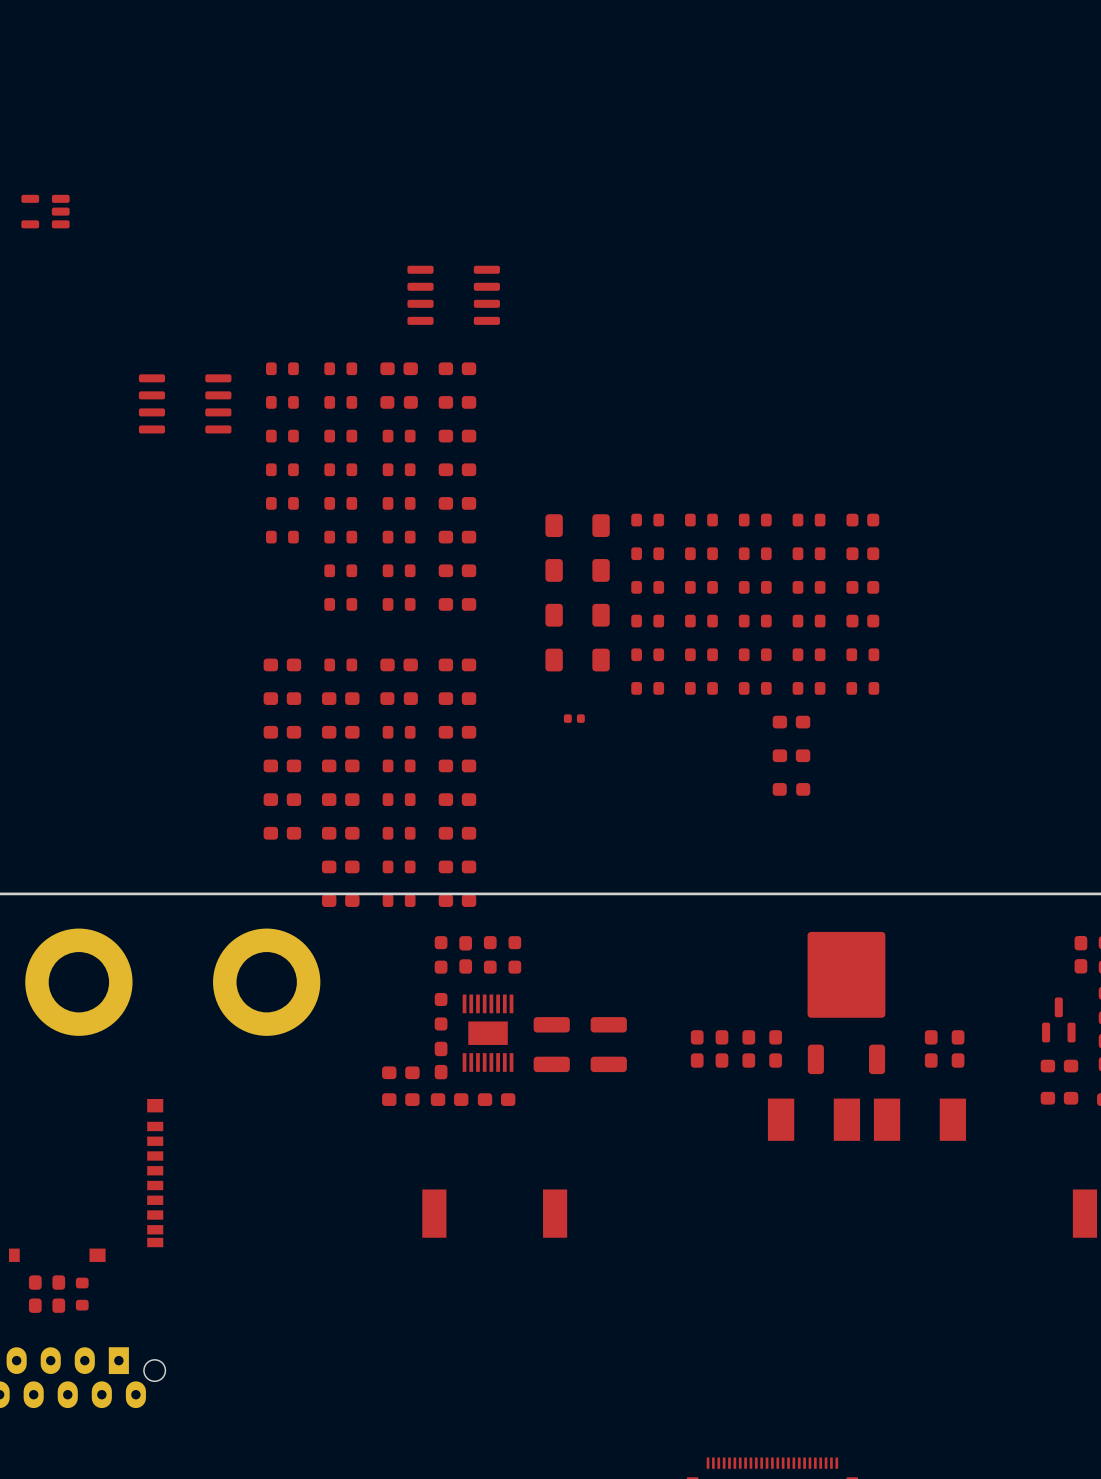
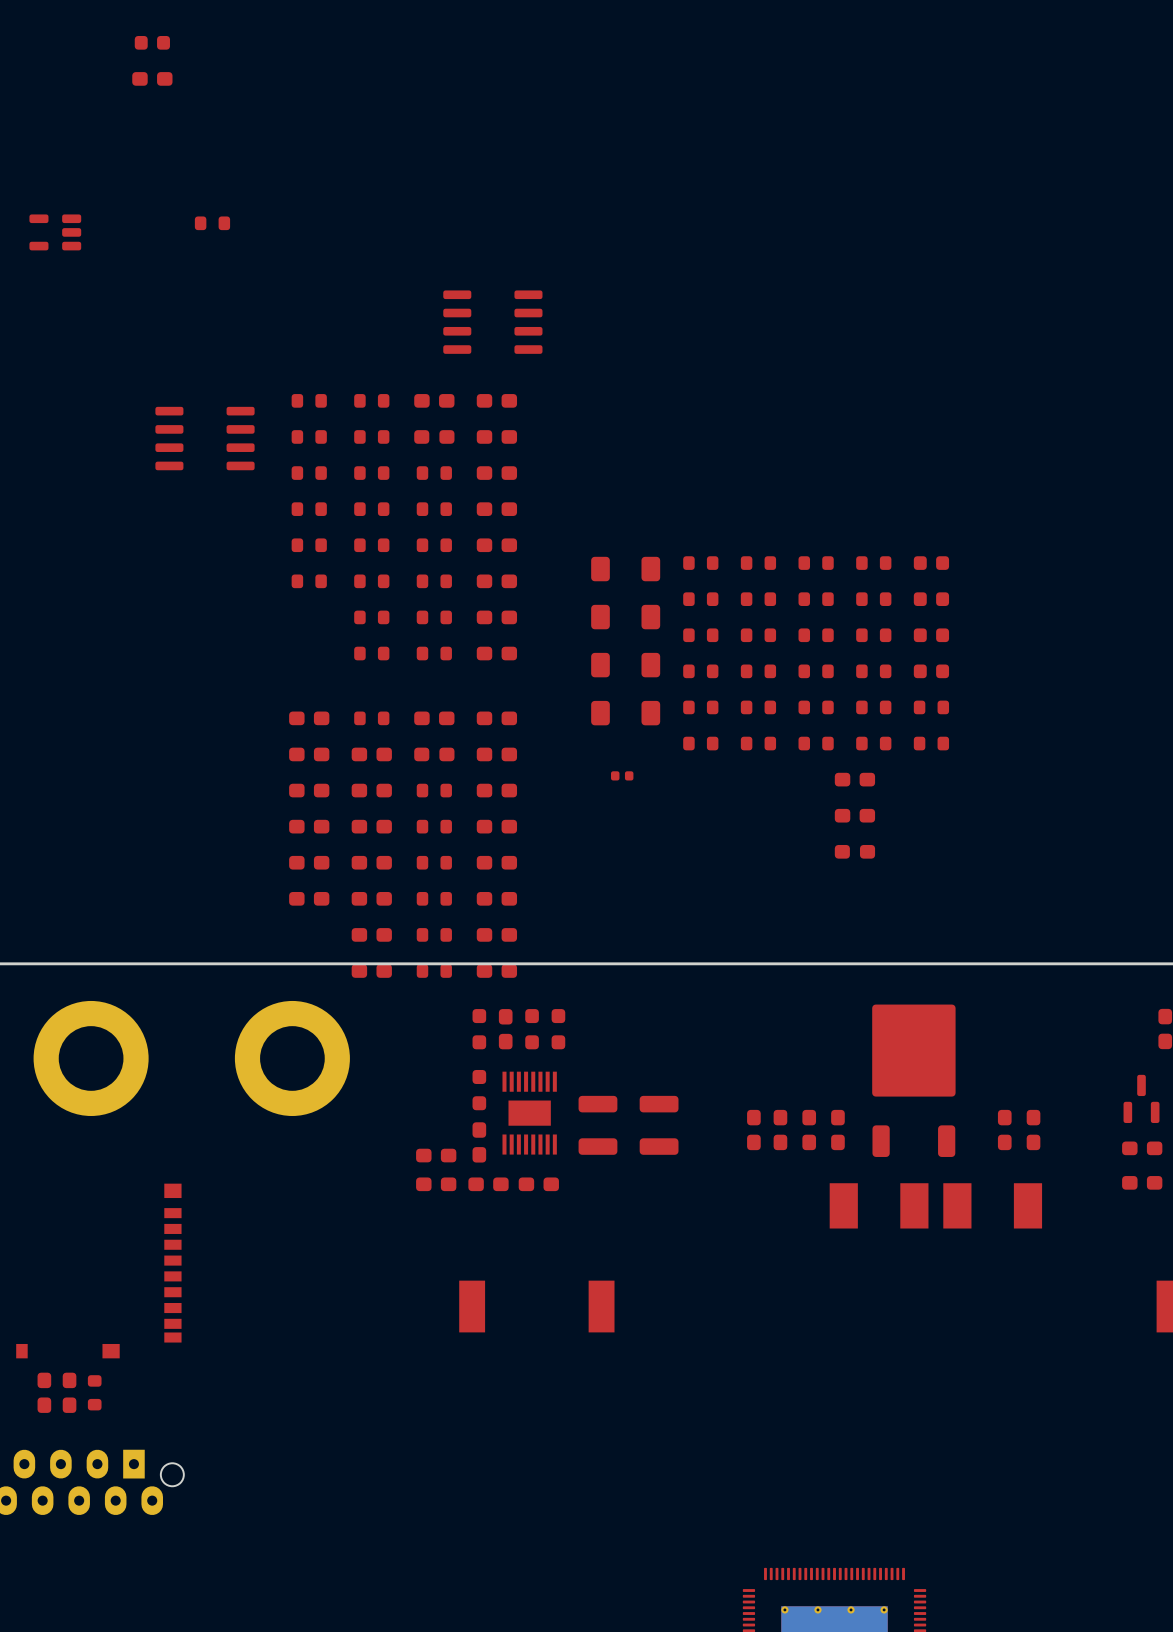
part: none -> (152, 42)
part: none -> (152, 78)
part: none -> (212, 223)

